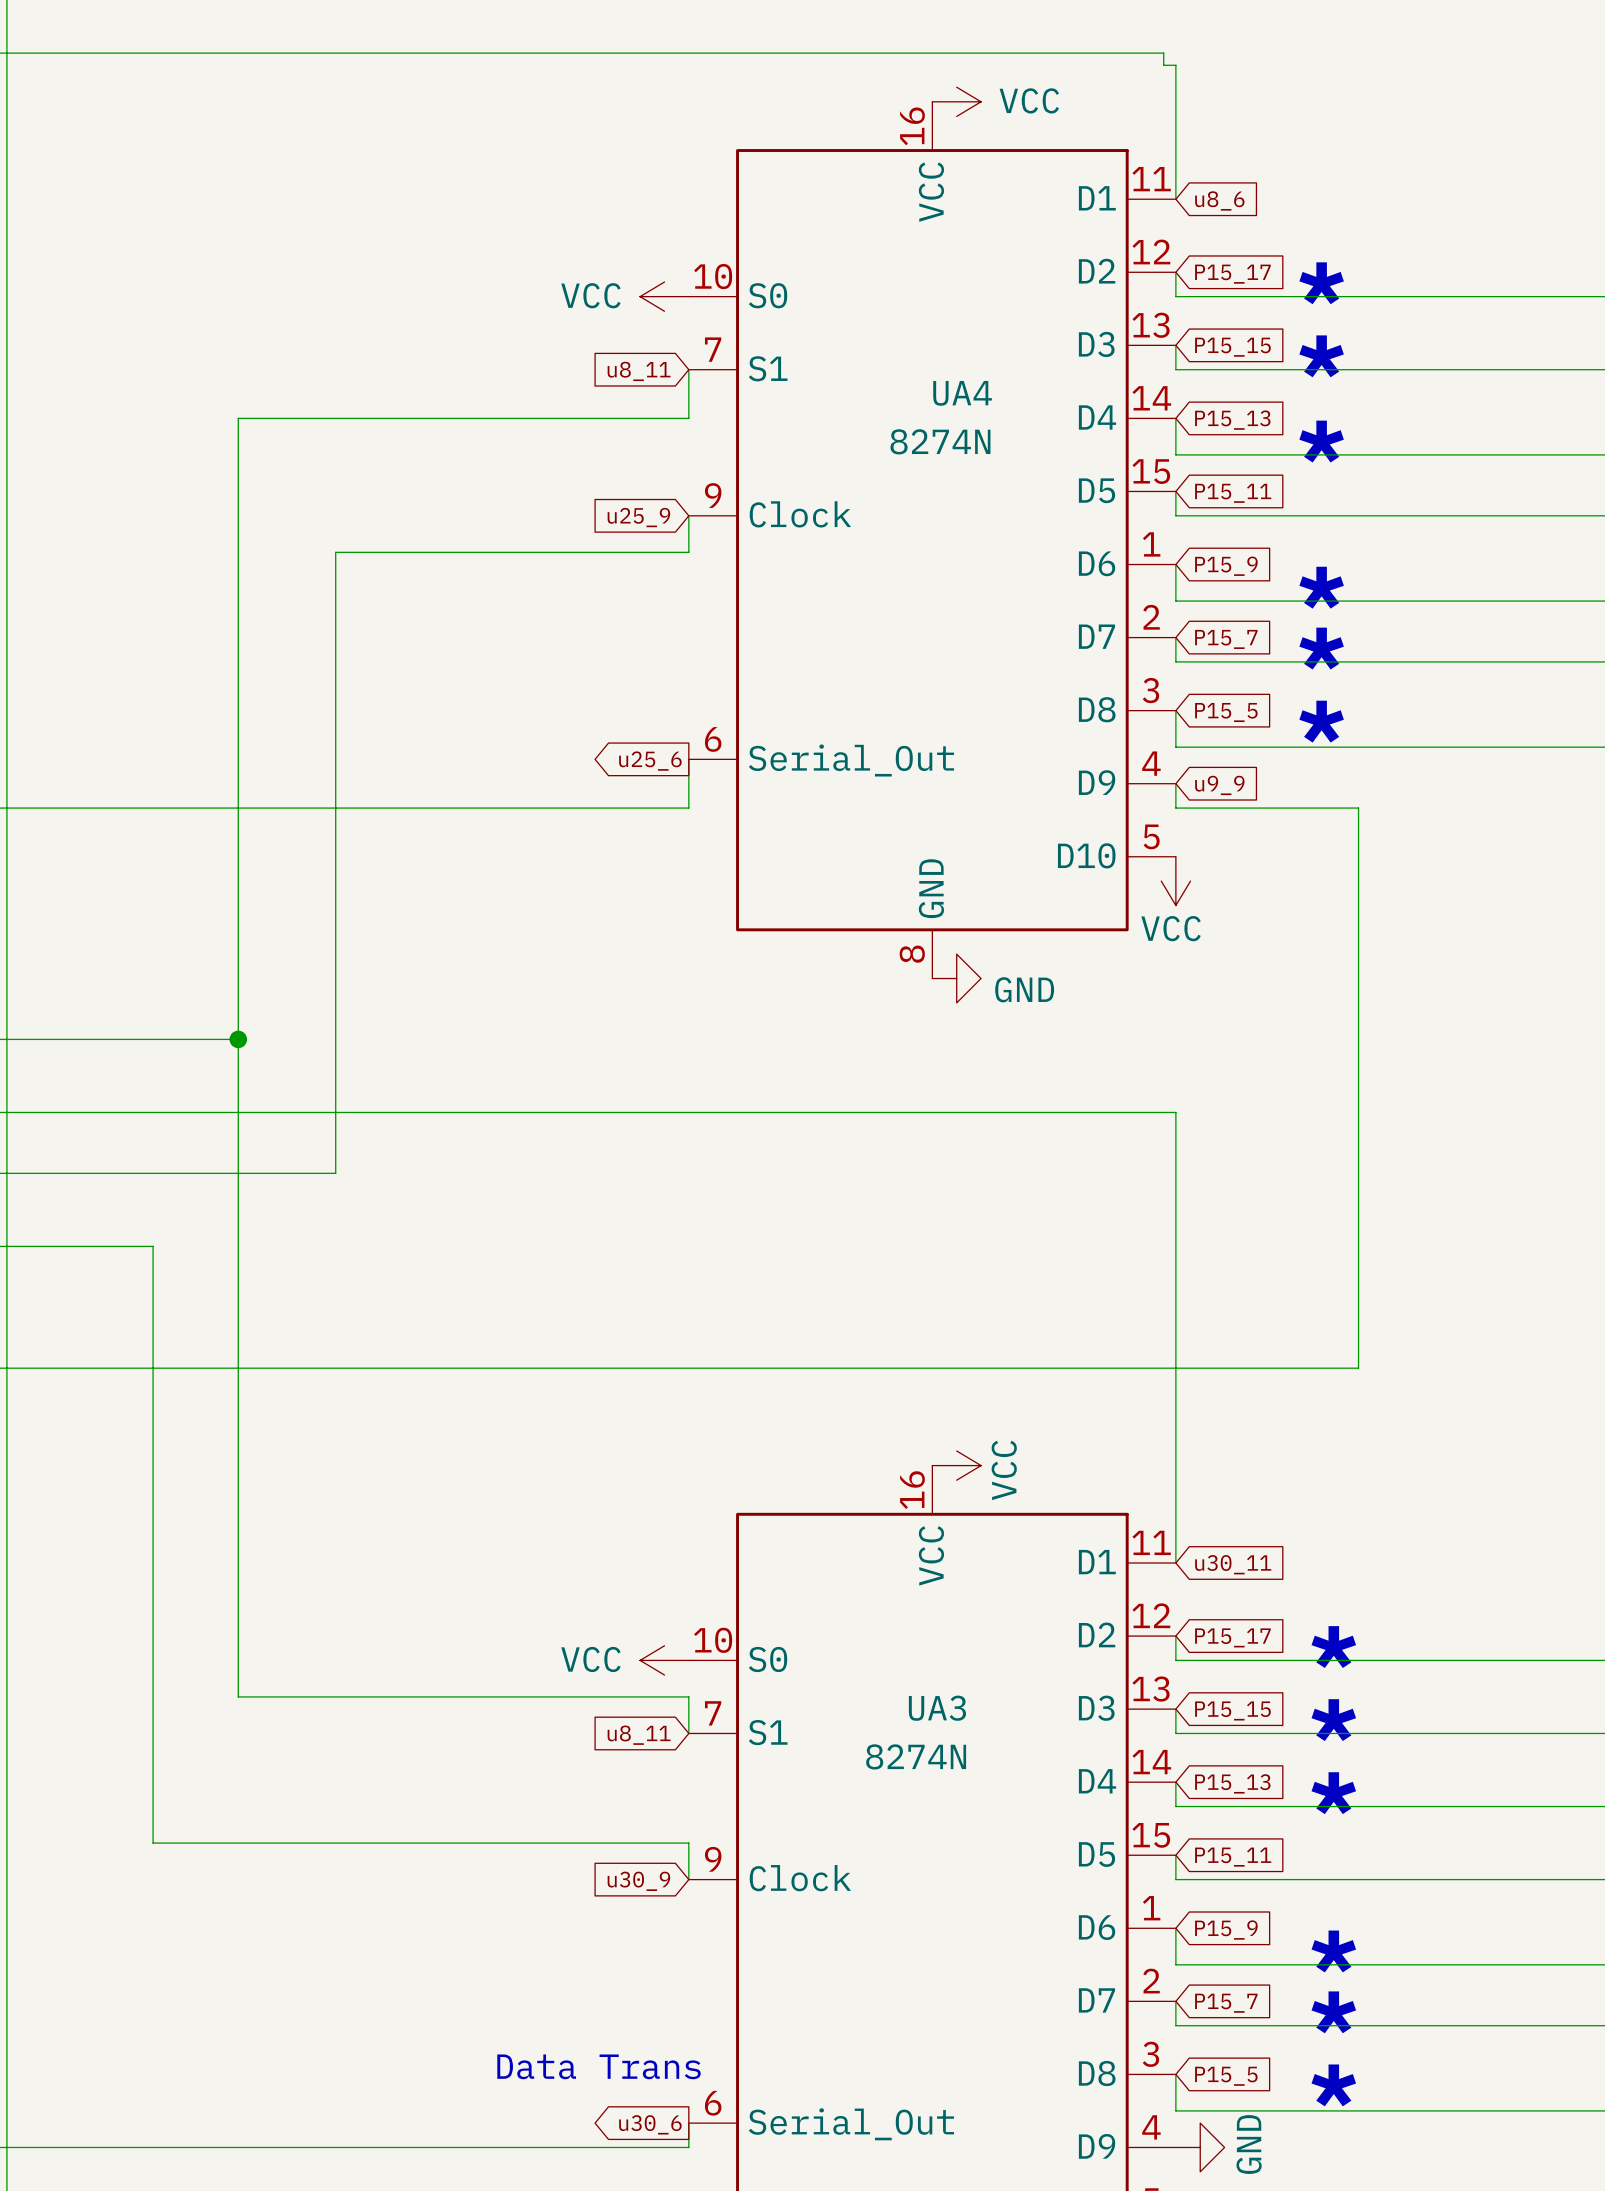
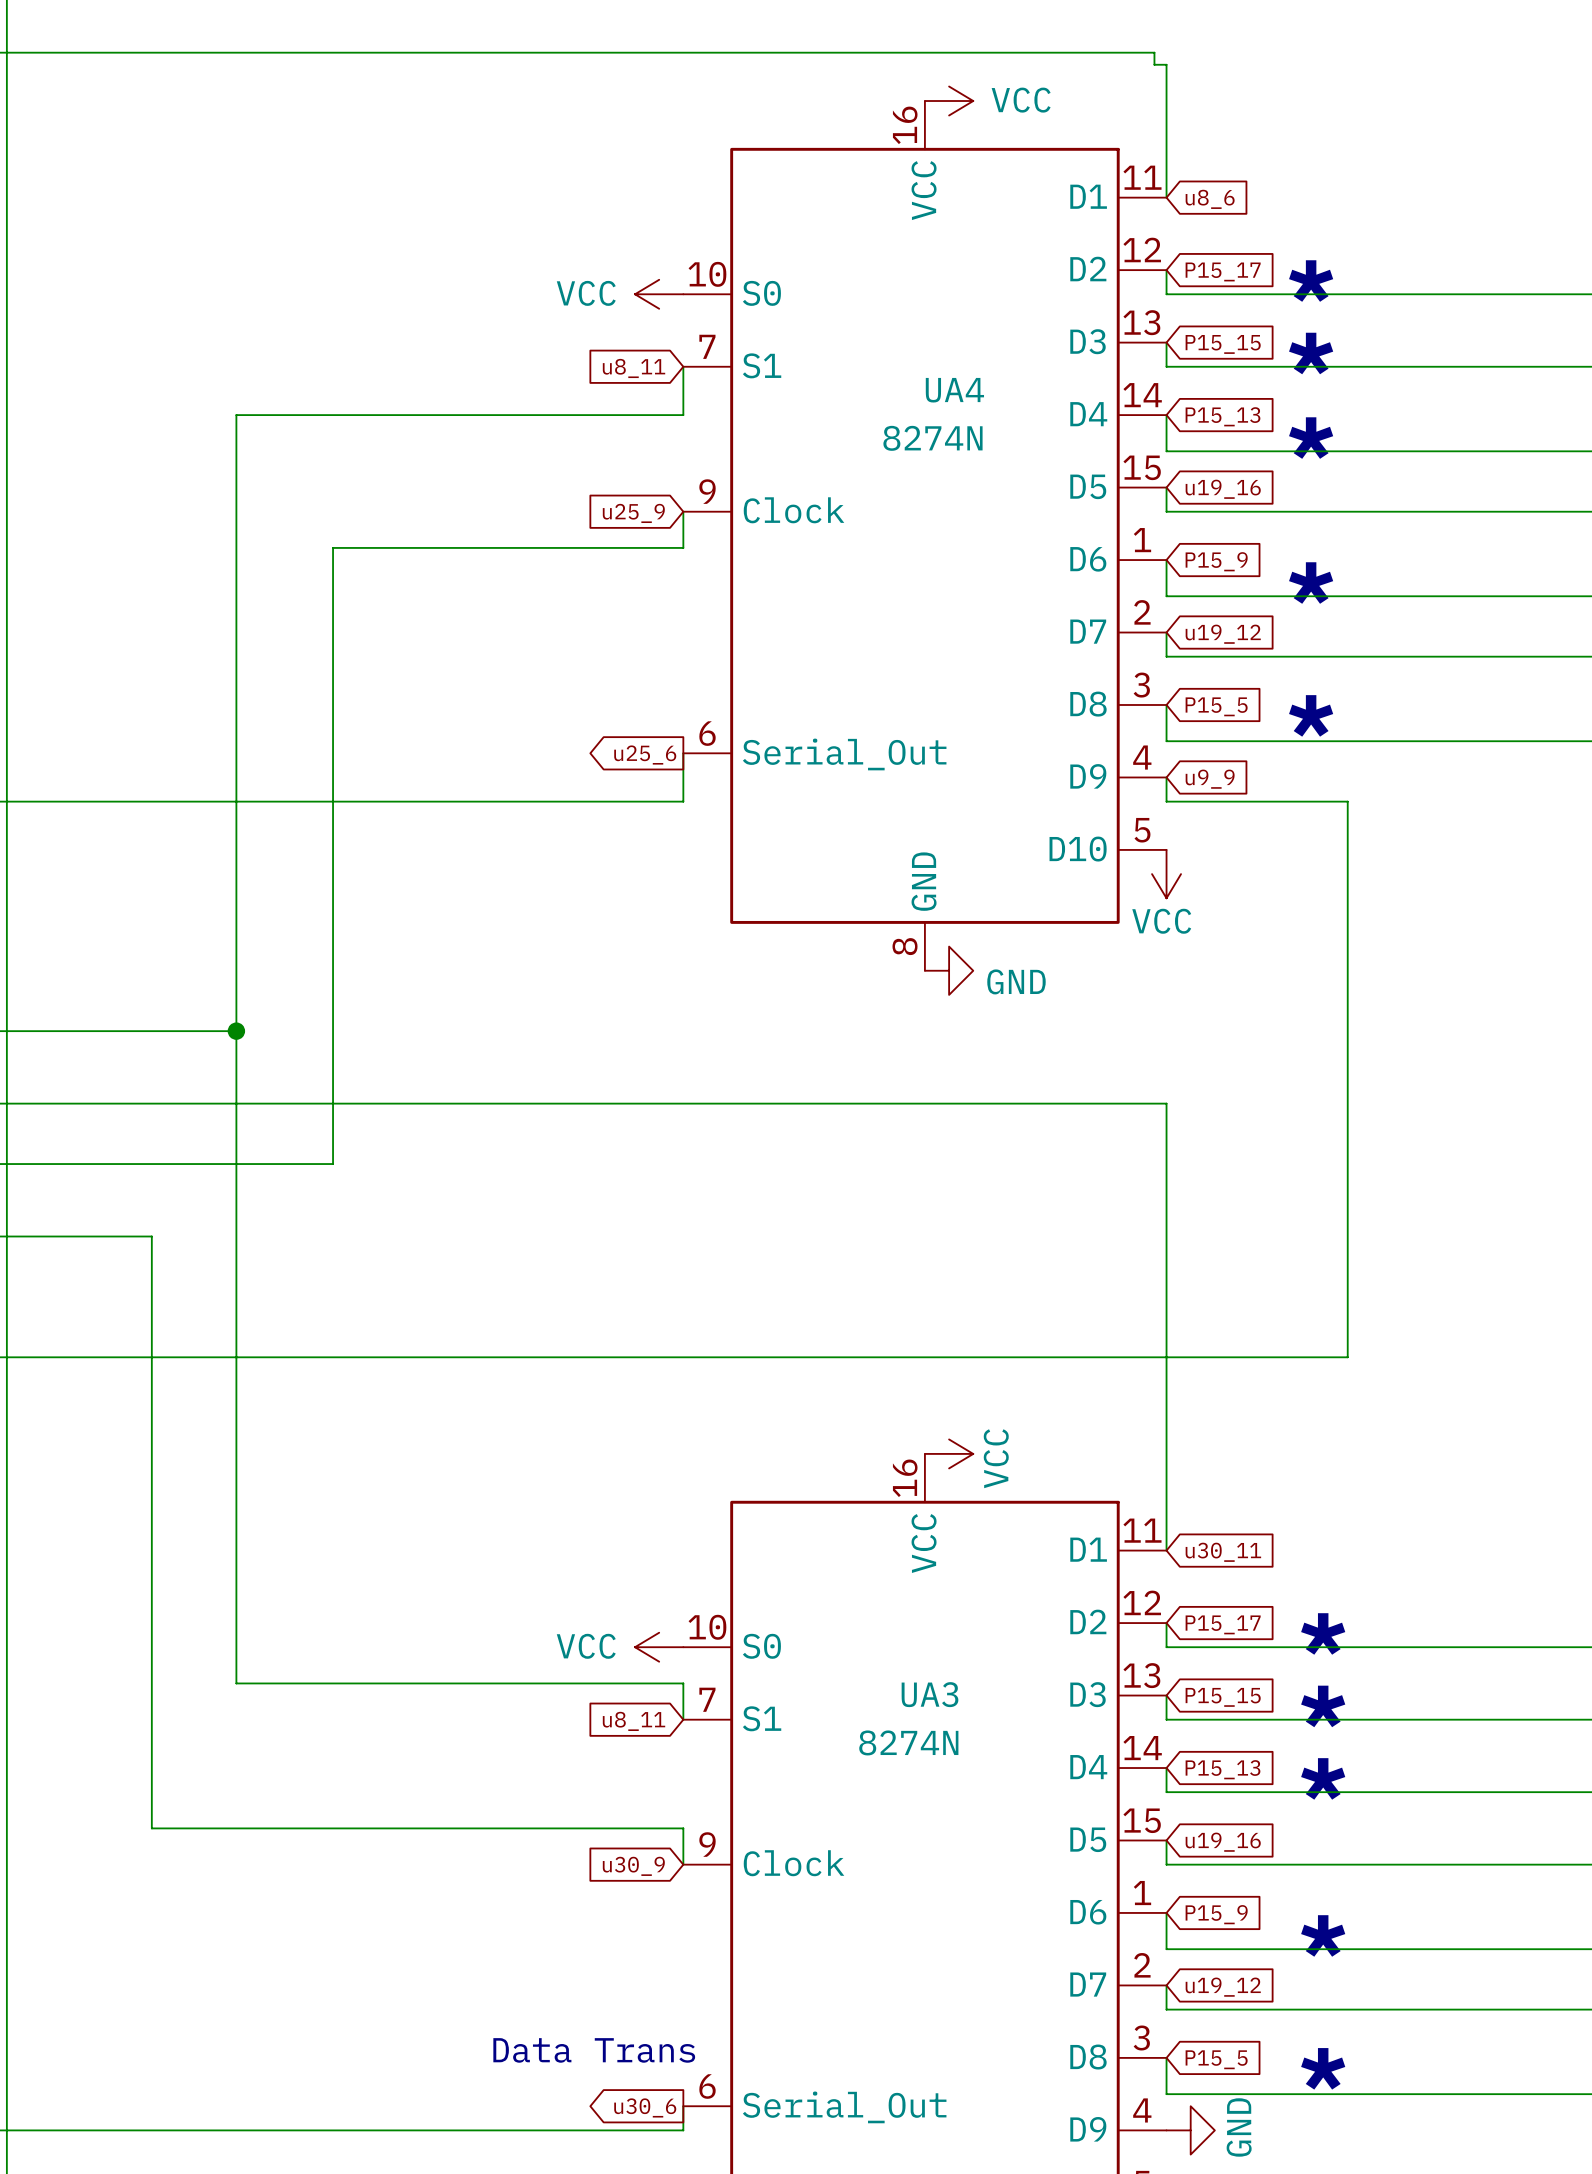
global label: P15_11 (1233, 493) -> u19_16 (1223, 489)
global label: P15_7 (1226, 639) -> u19_12 (1223, 634)
text: * (1321, 648) -> none
global label: P15_11 (1233, 1857) -> u19_16 (1223, 1842)
global label: P15_7 (1226, 2003) -> u19_12 (1223, 1987)
text: * (1333, 2012) -> none

